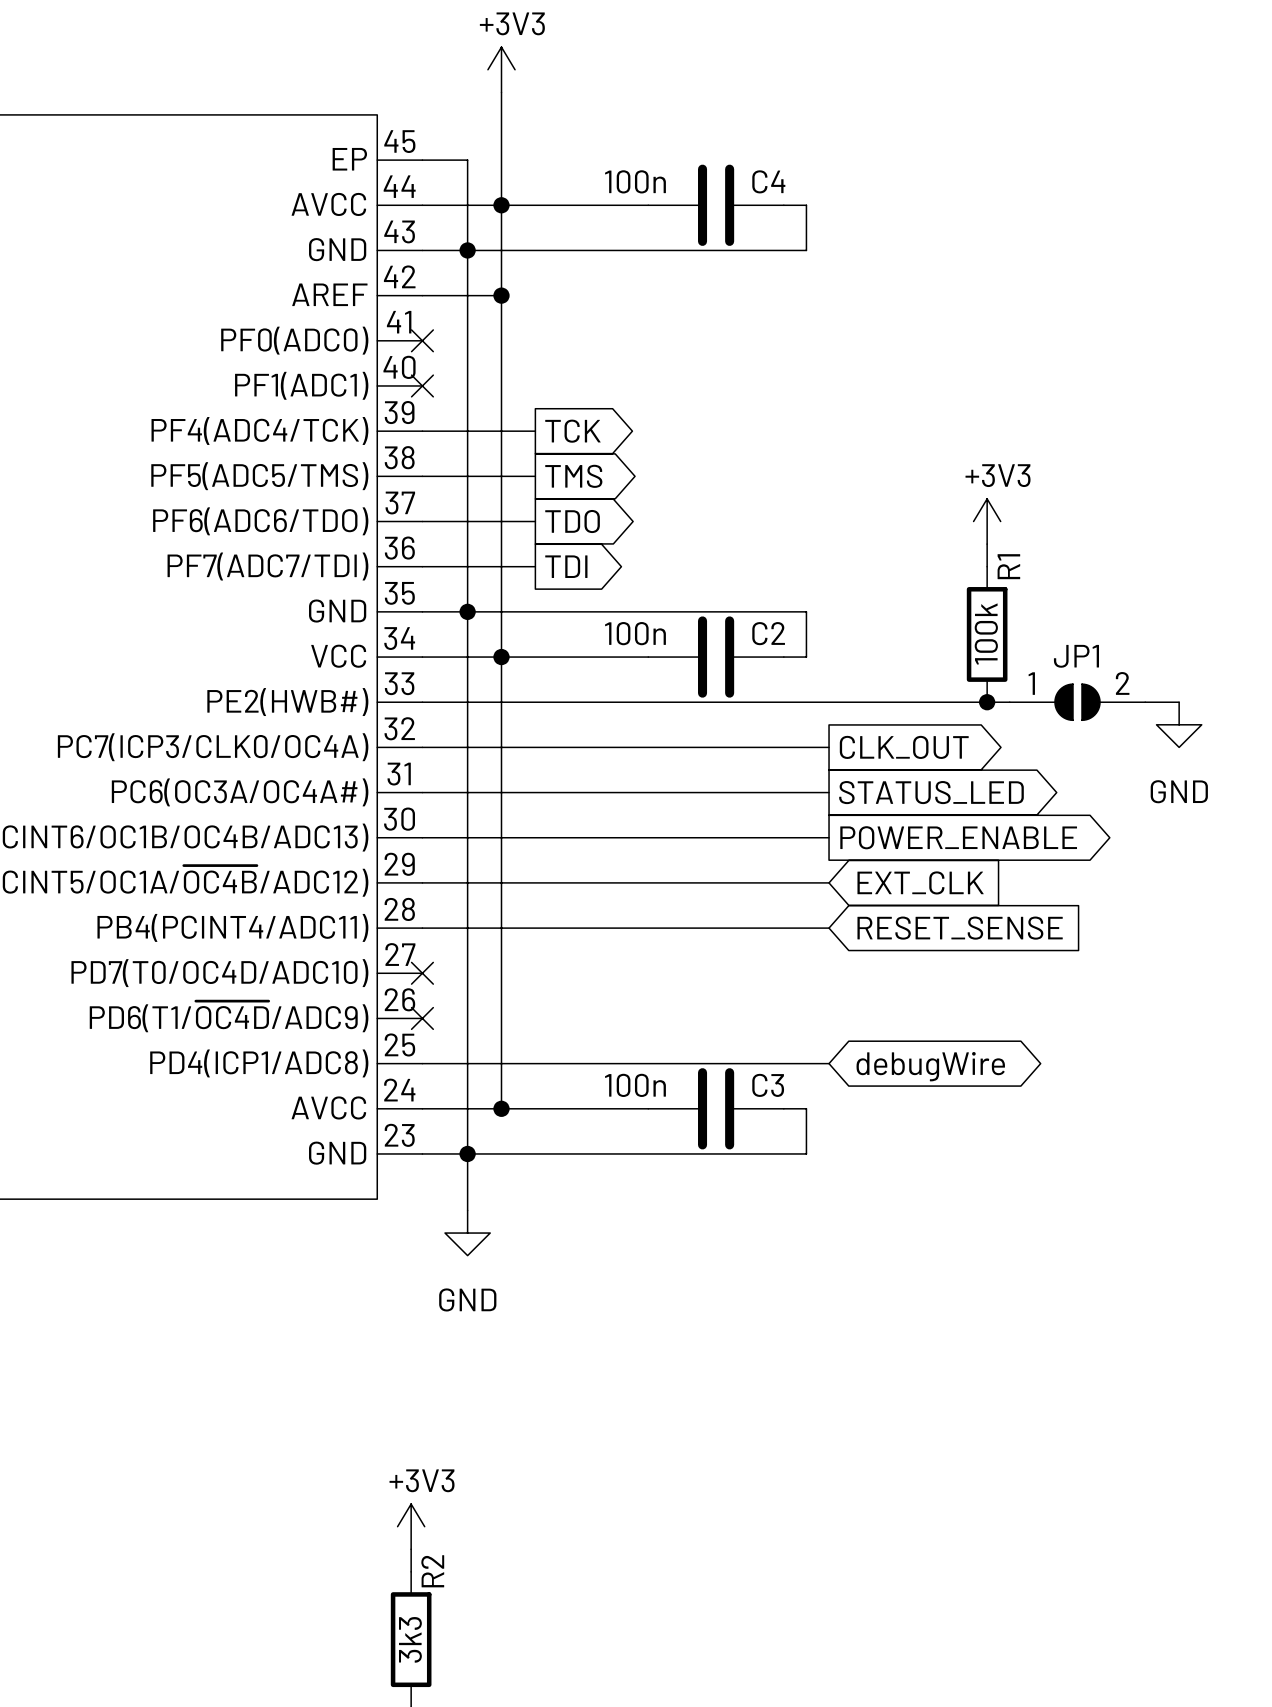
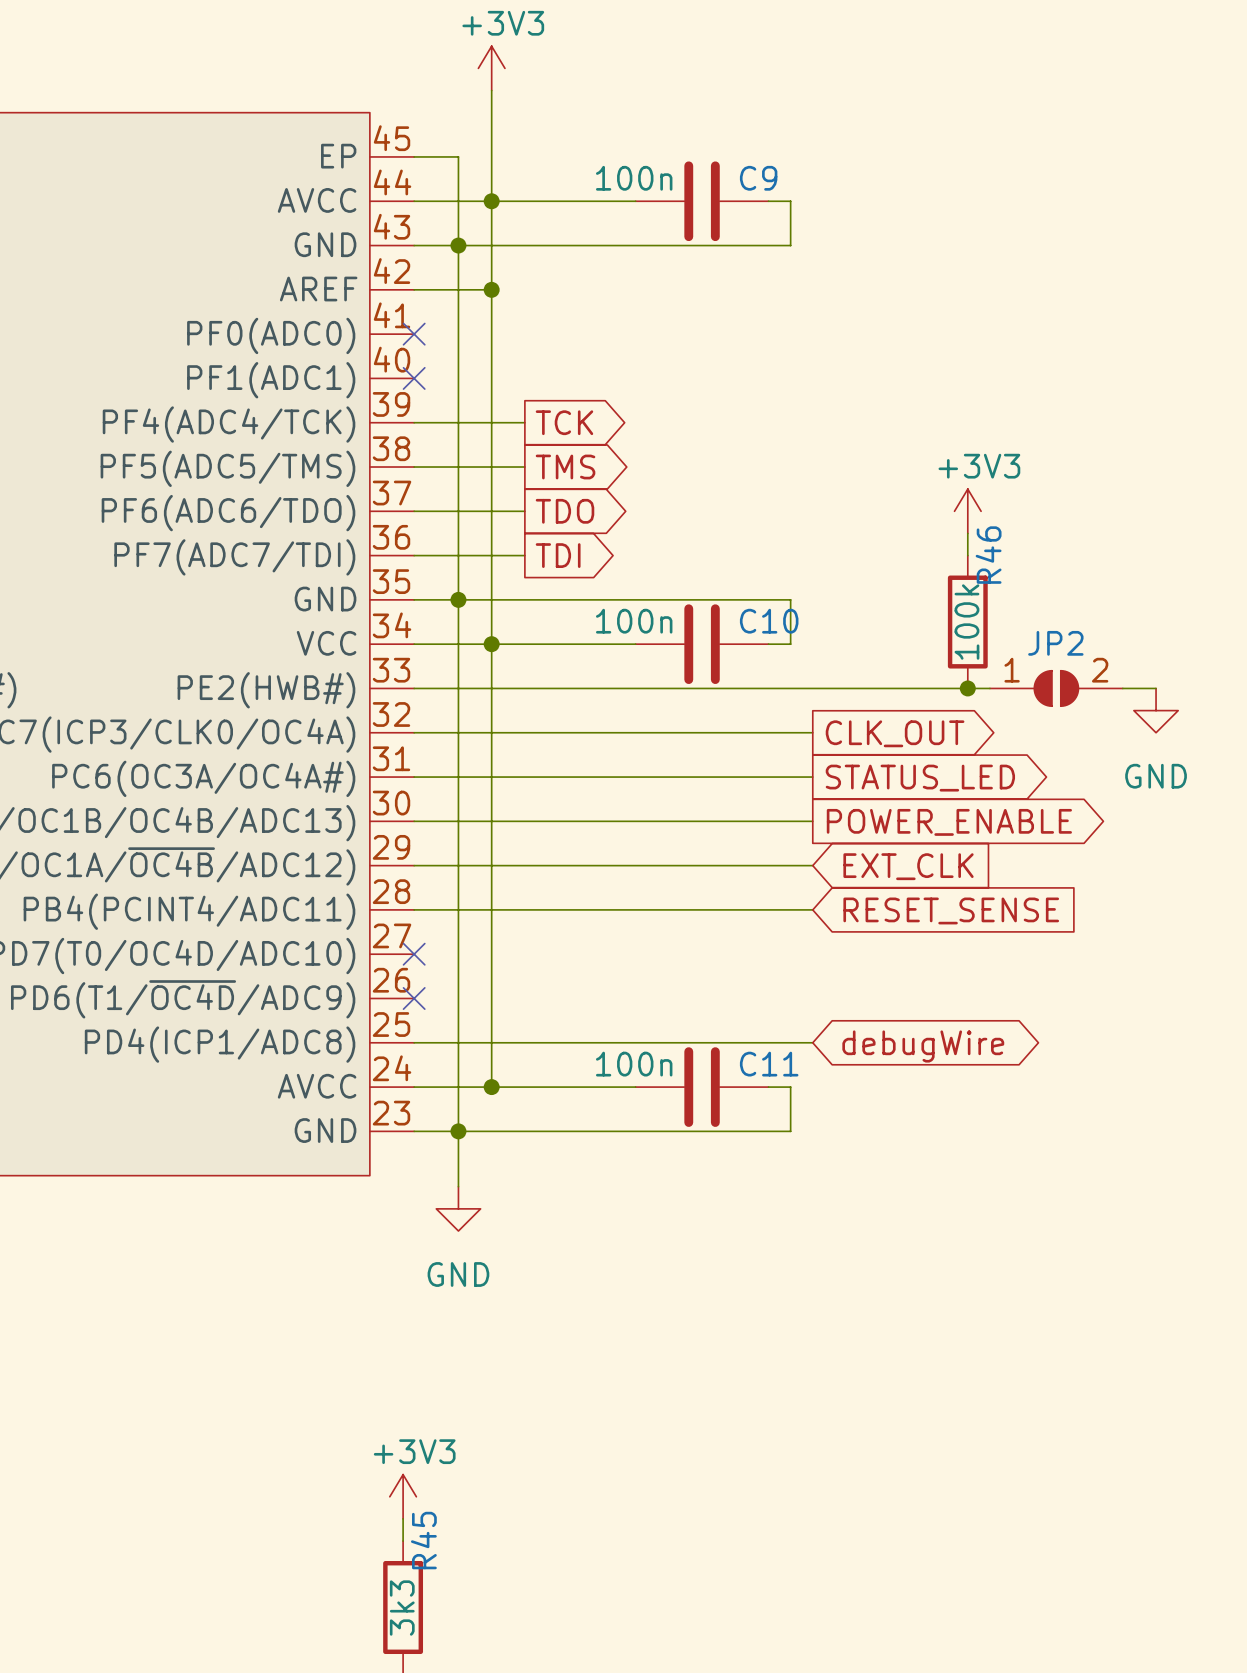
C4 name: C4 (768, 181) -> C9 (758, 178)
R1 name: R1 (1008, 566) -> R46 (988, 555)
C2 name: C2 (768, 633) -> C10 (769, 621)
JP1 name: JP1 (1076, 656) -> JP2 (1055, 643)
C3 name: C3 (768, 1085) -> C11 (769, 1064)
R2 name: R2 (432, 1571) -> R45 (423, 1540)

